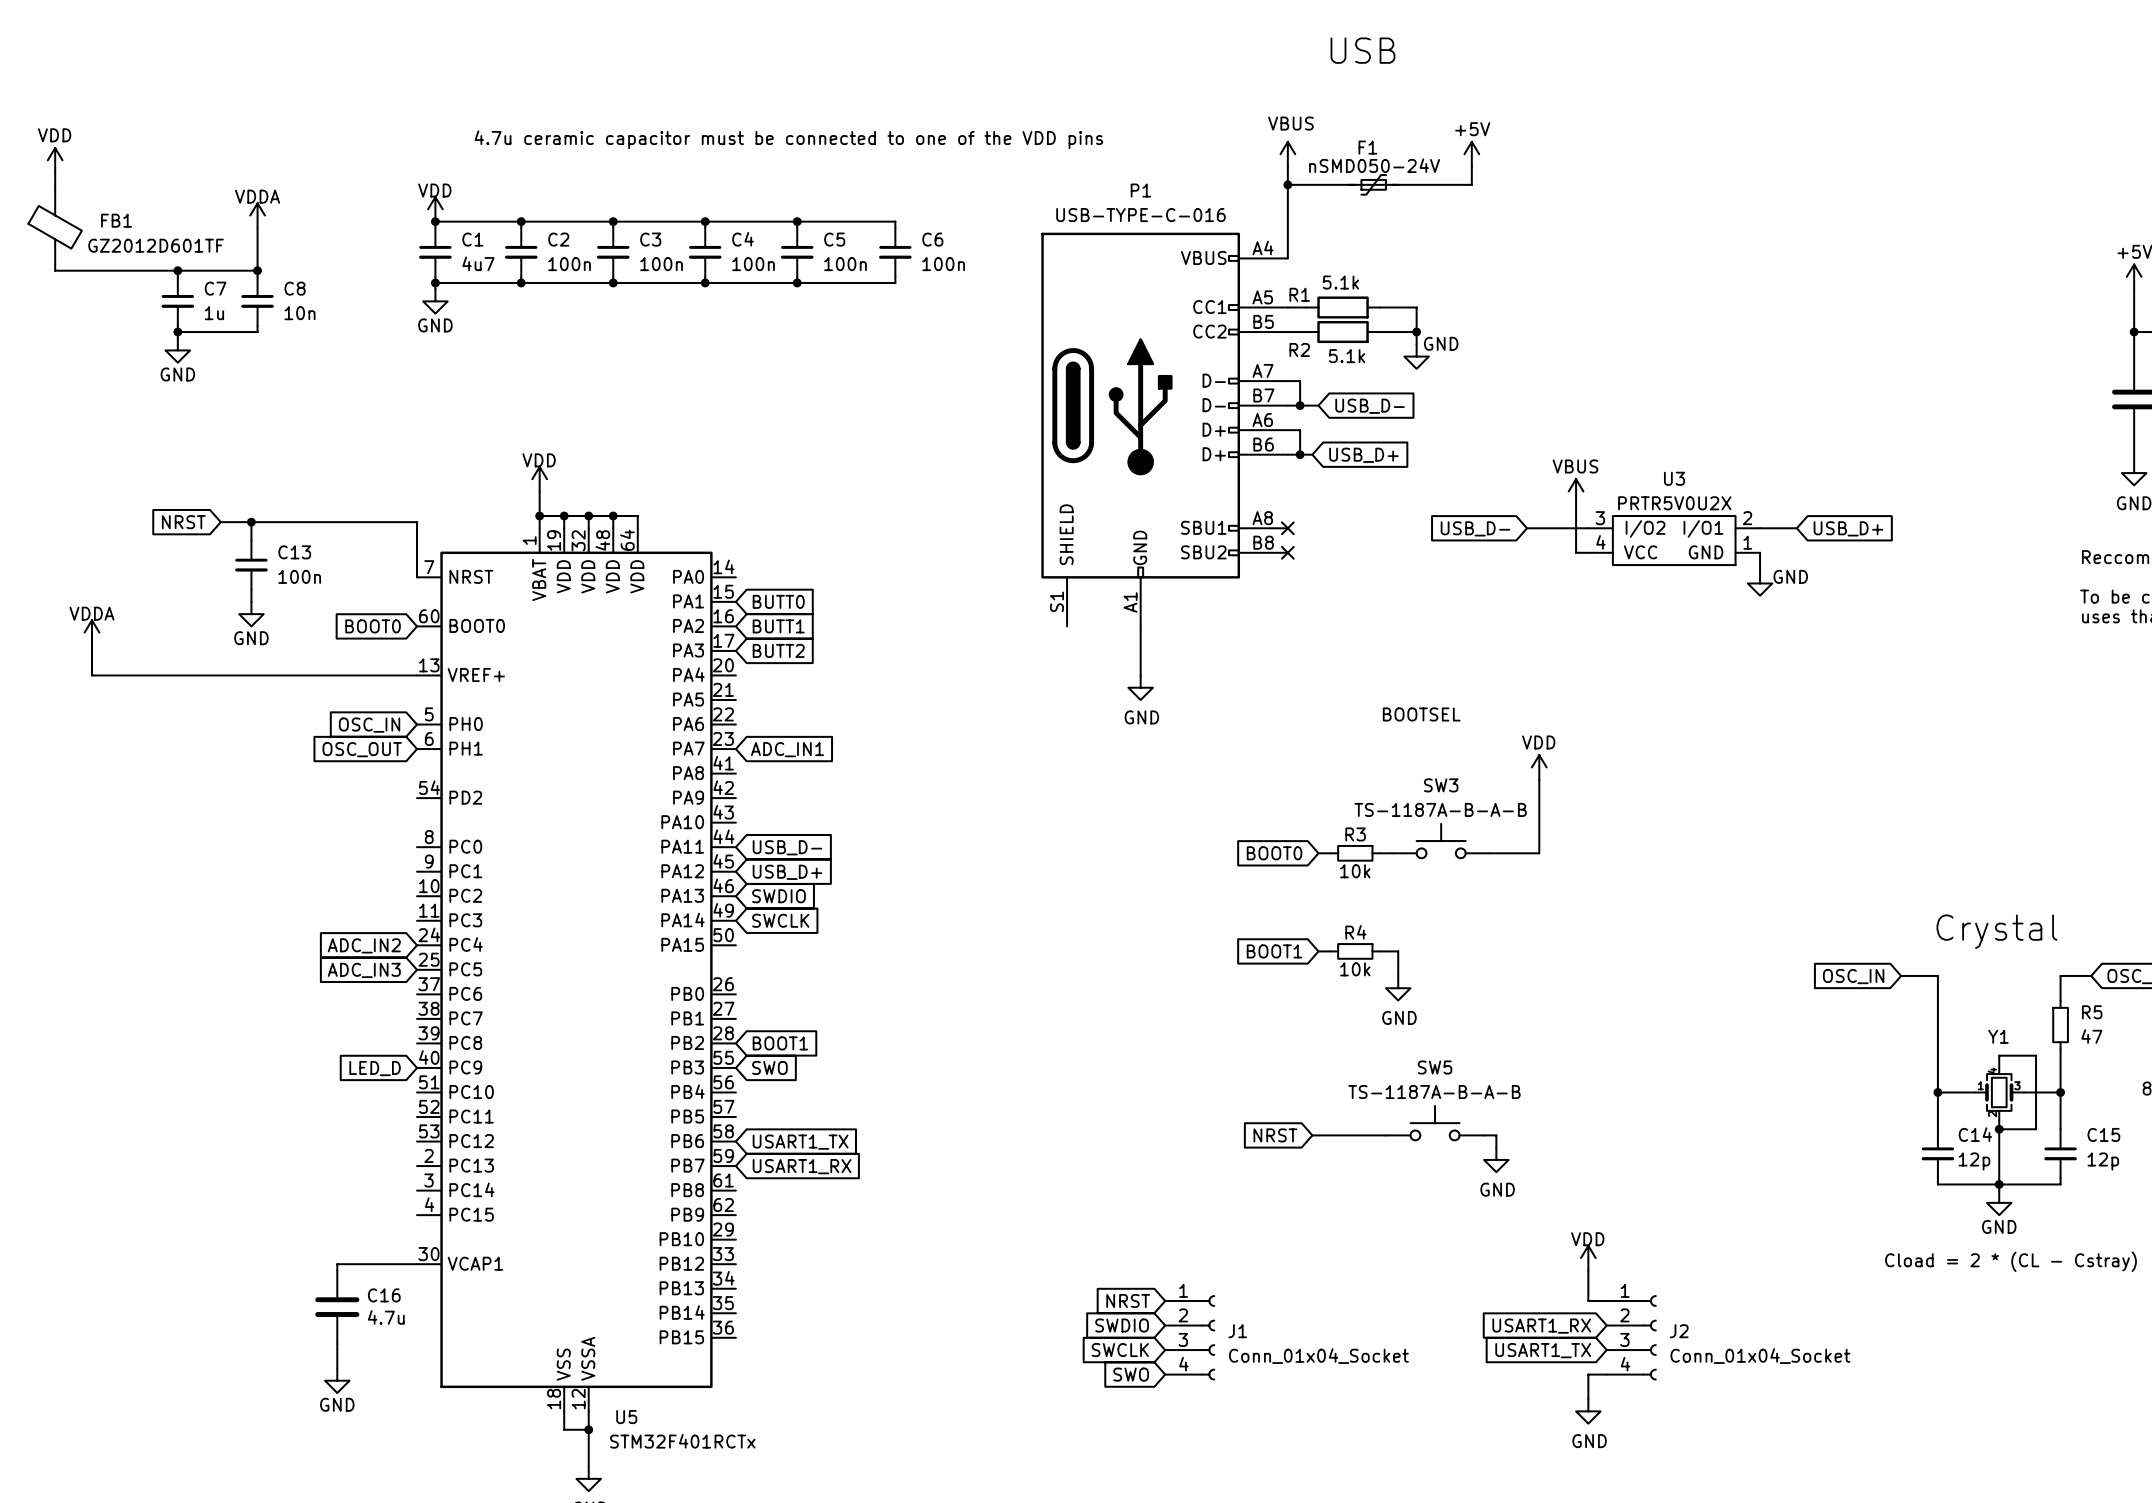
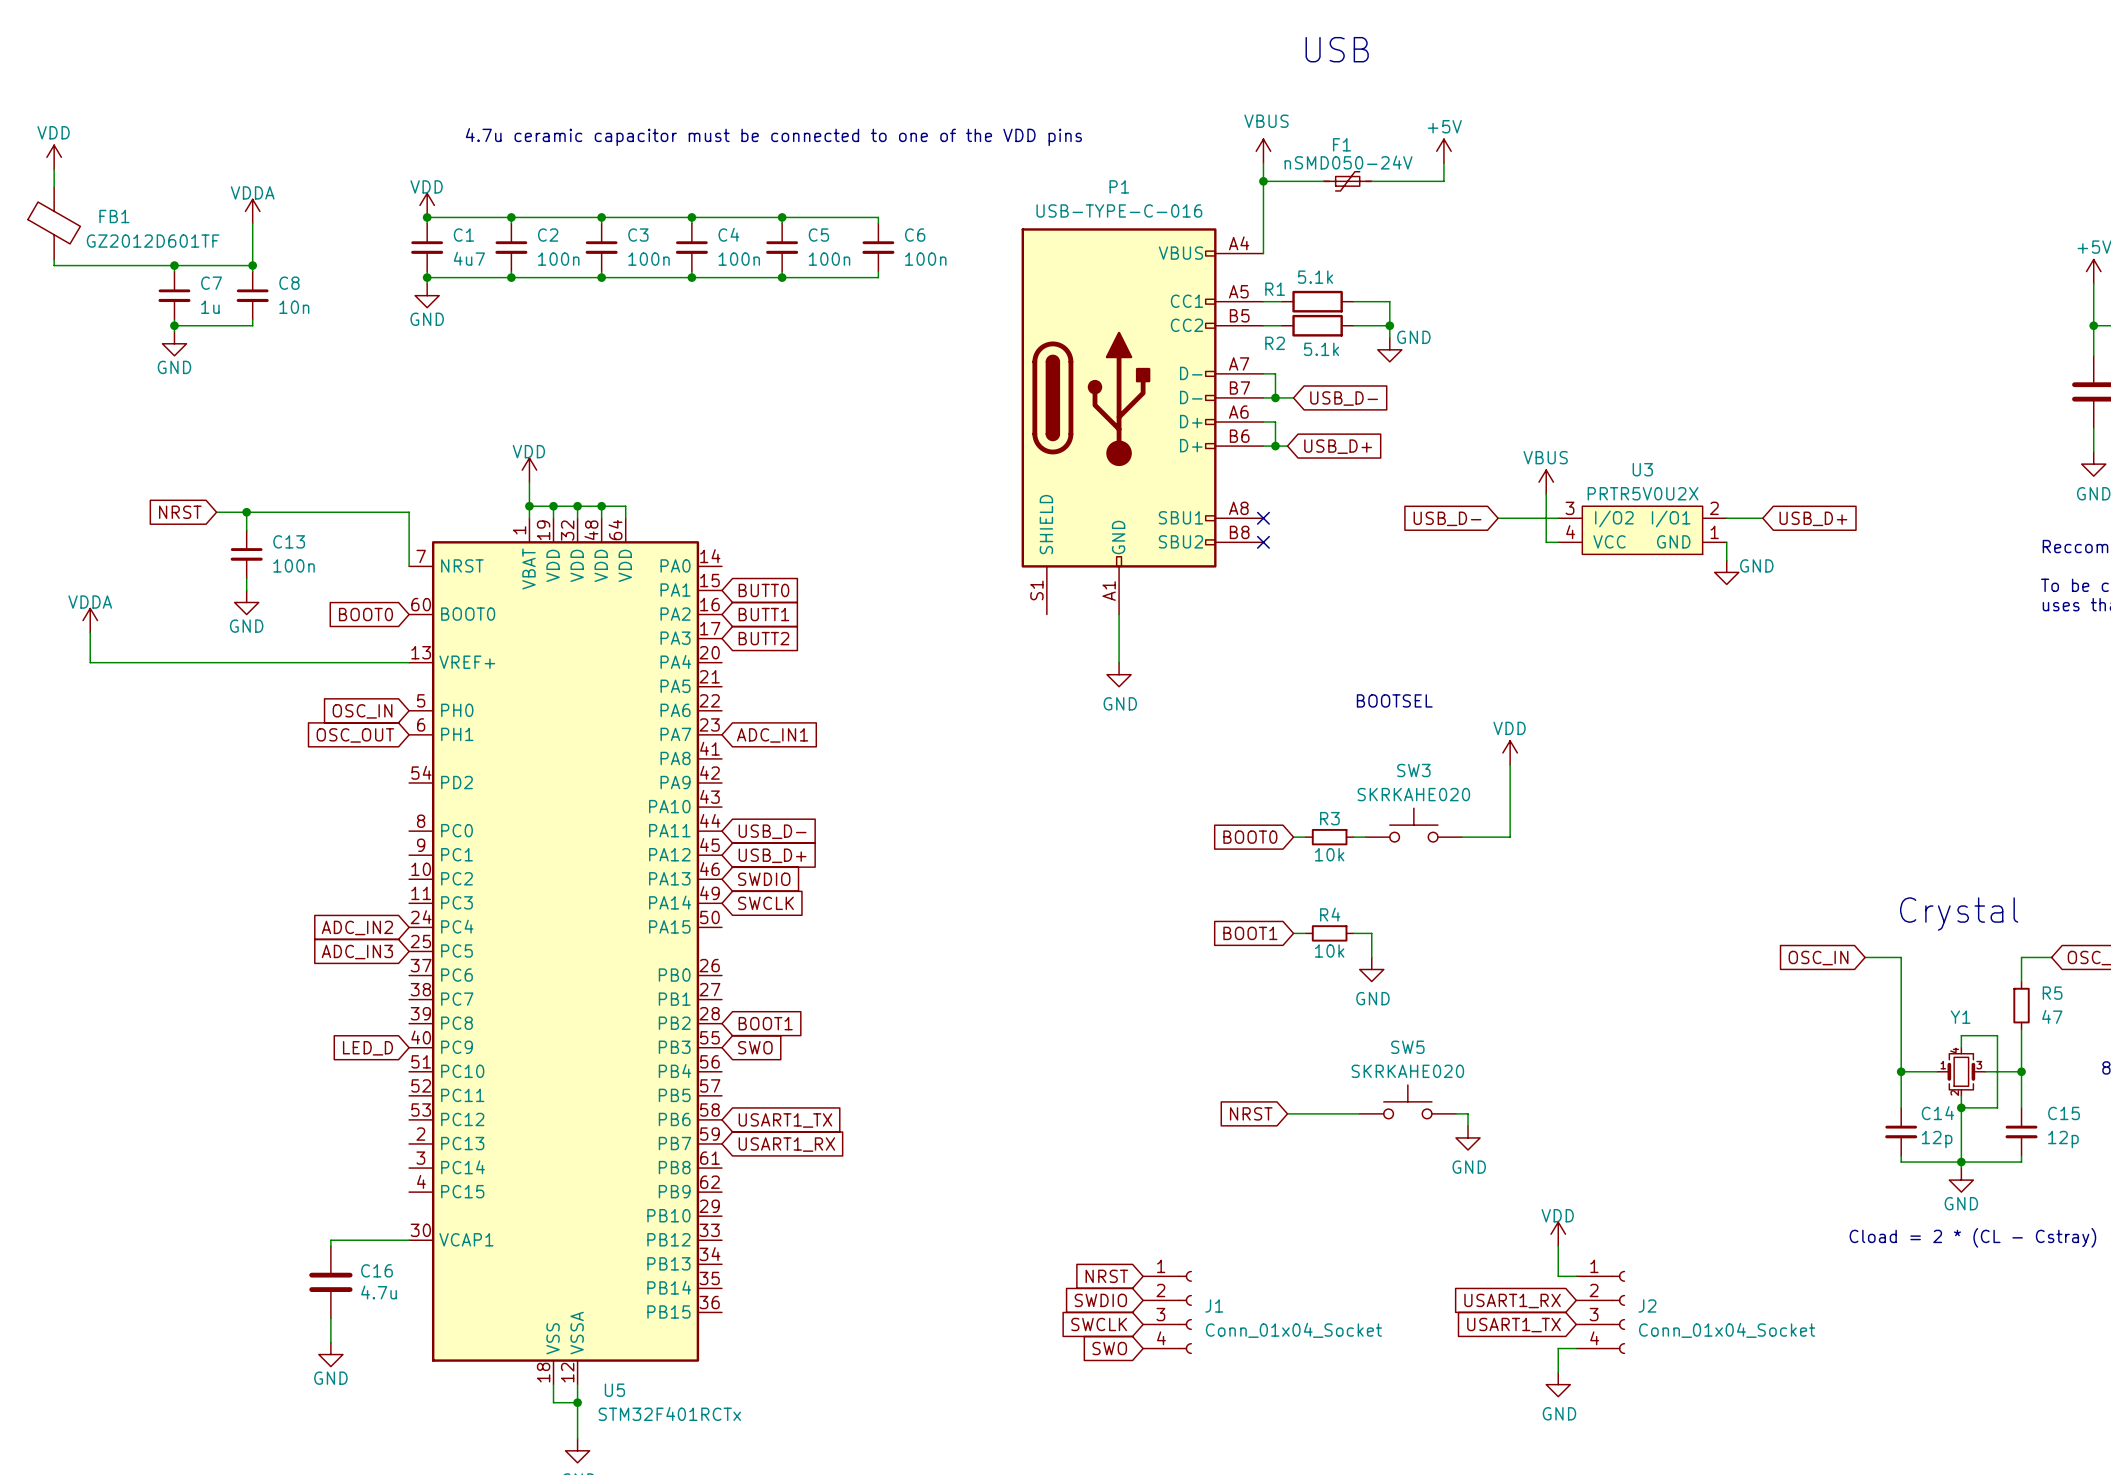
SW3 value: TS-1187A-B-A-B (1440, 809) -> SKRKAHE020 (1413, 794)
SW5 value: TS-1187A-B-A-B (1434, 1092) -> SKRKAHE020 (1407, 1071)

